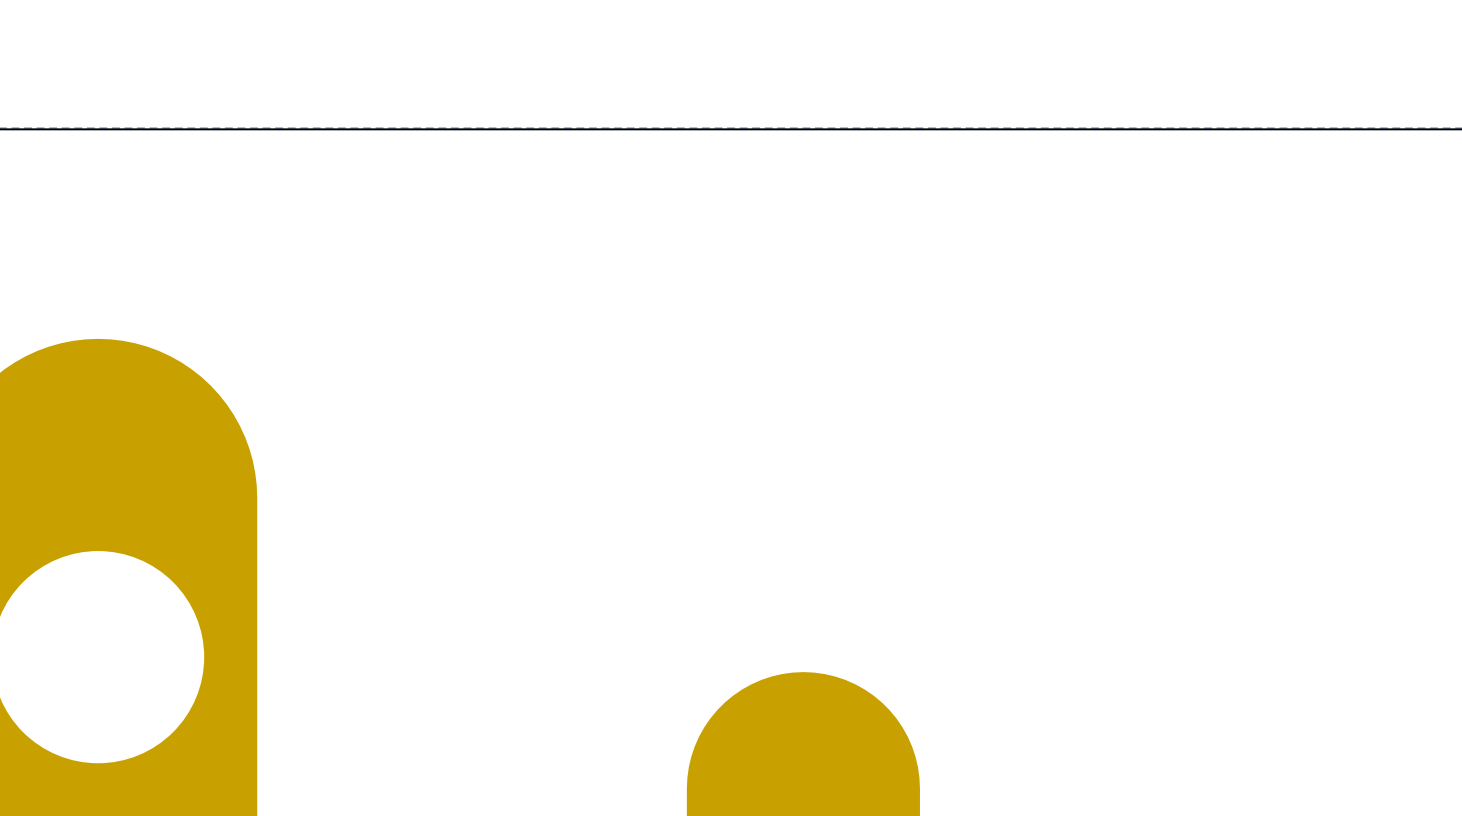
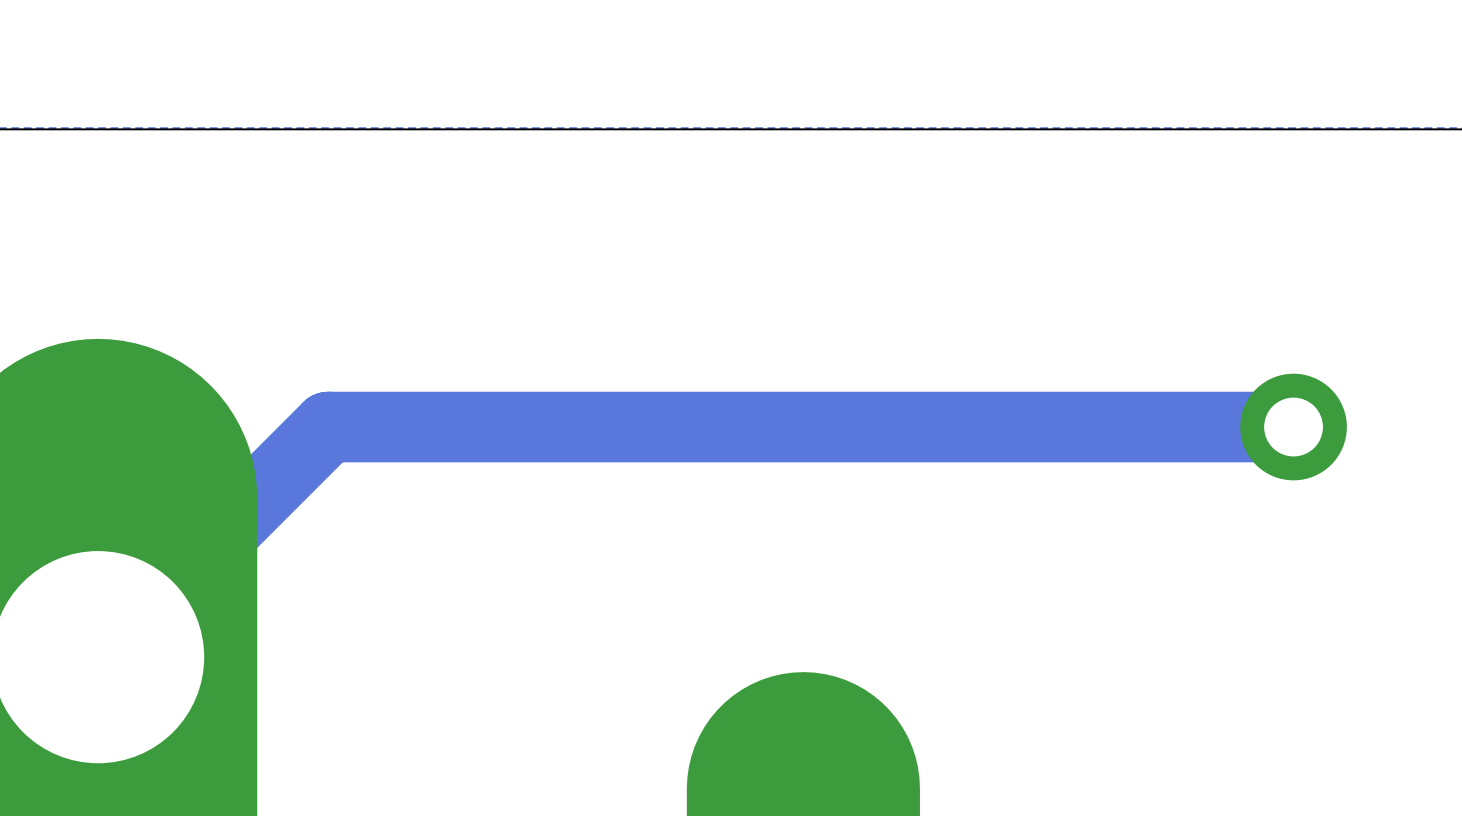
track: none -> (1293, 427) (328, 427) (98, 657)
via: none -> (1293, 427)

